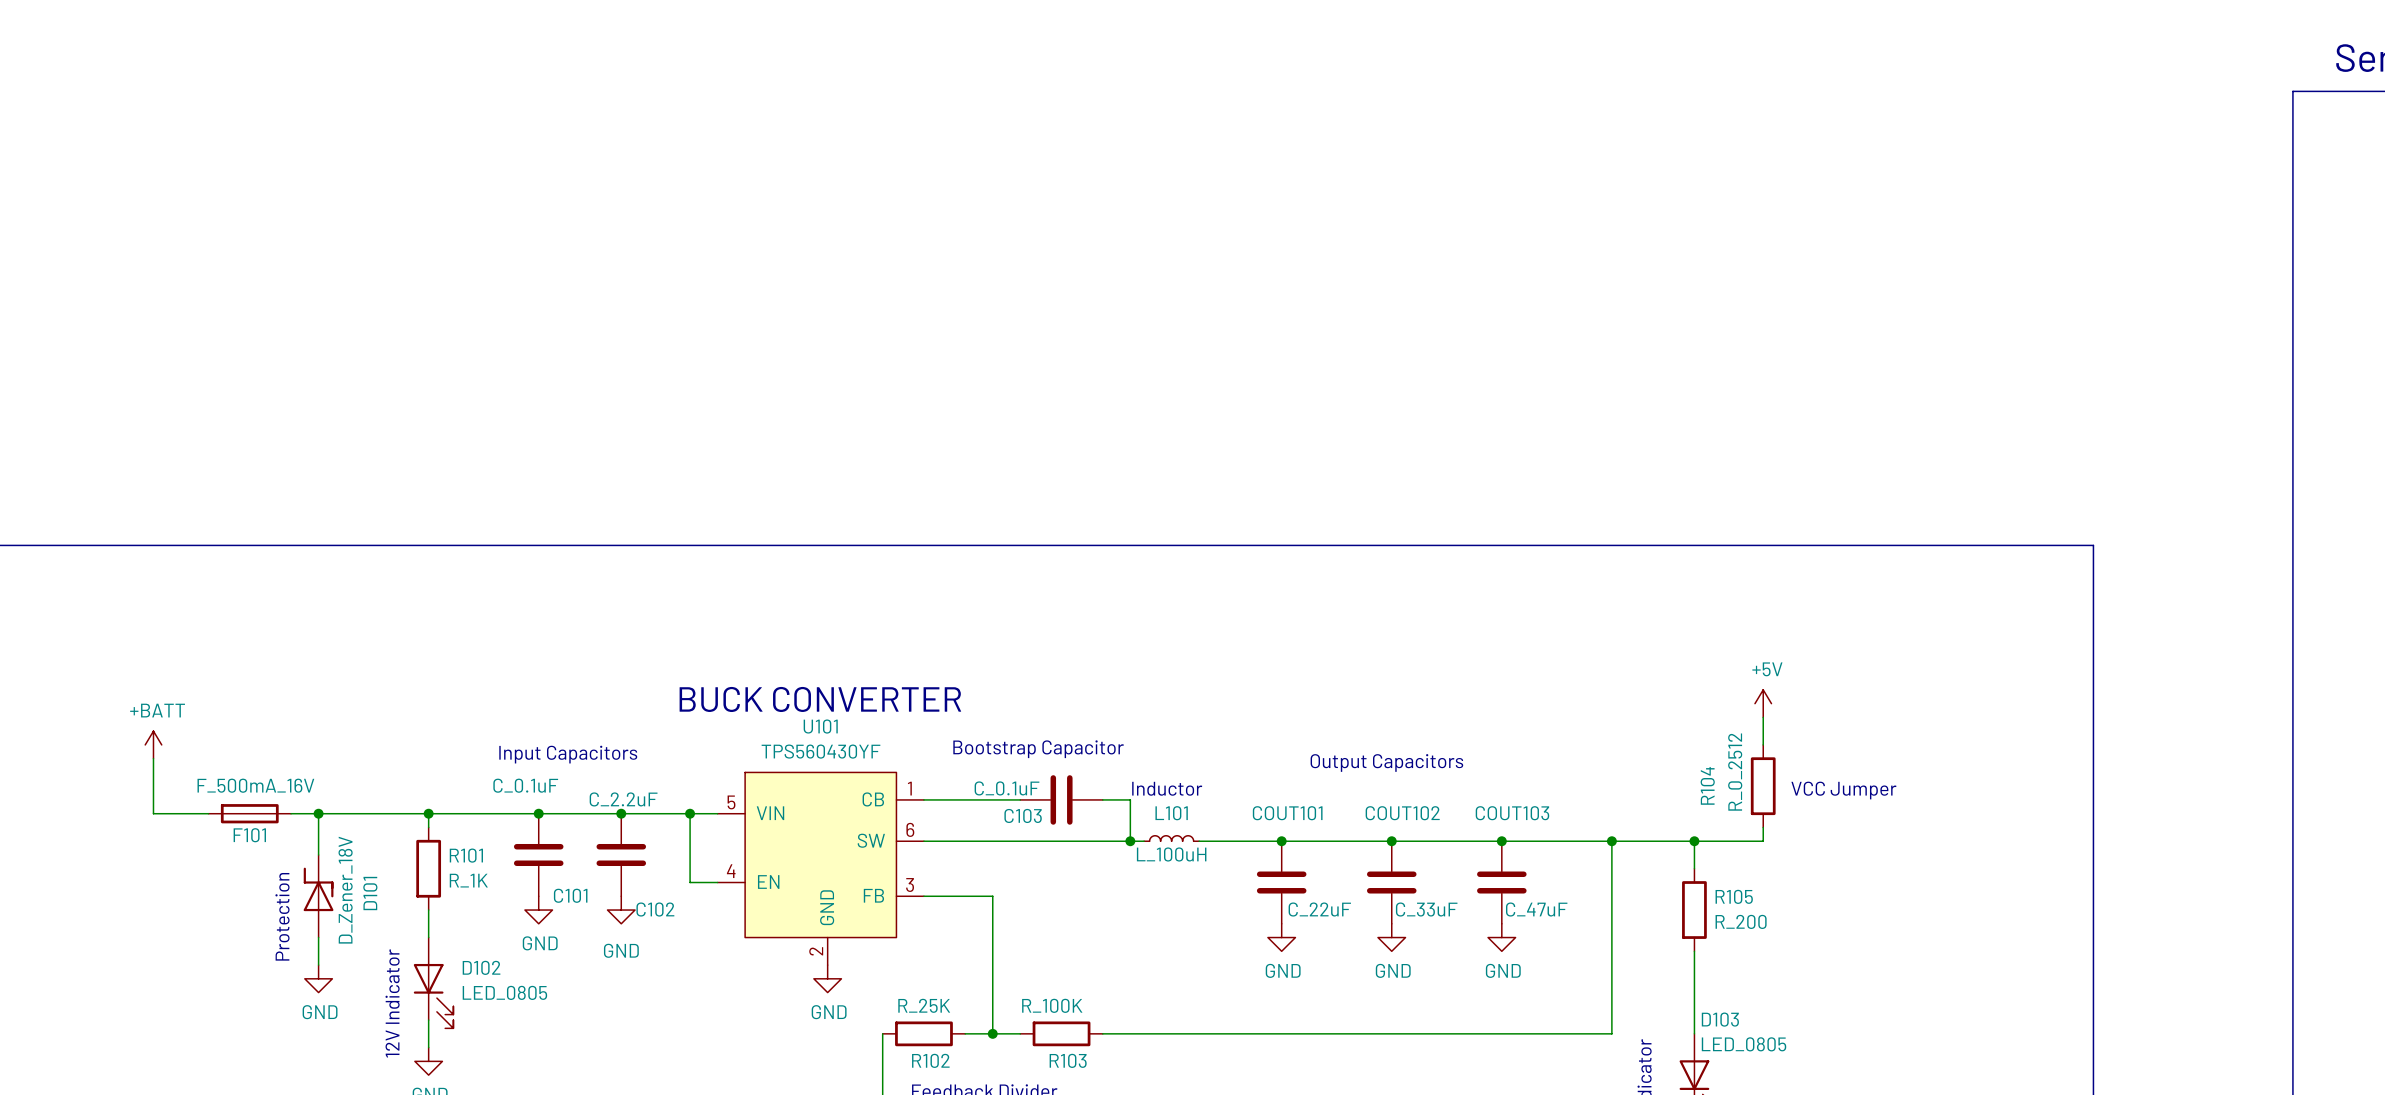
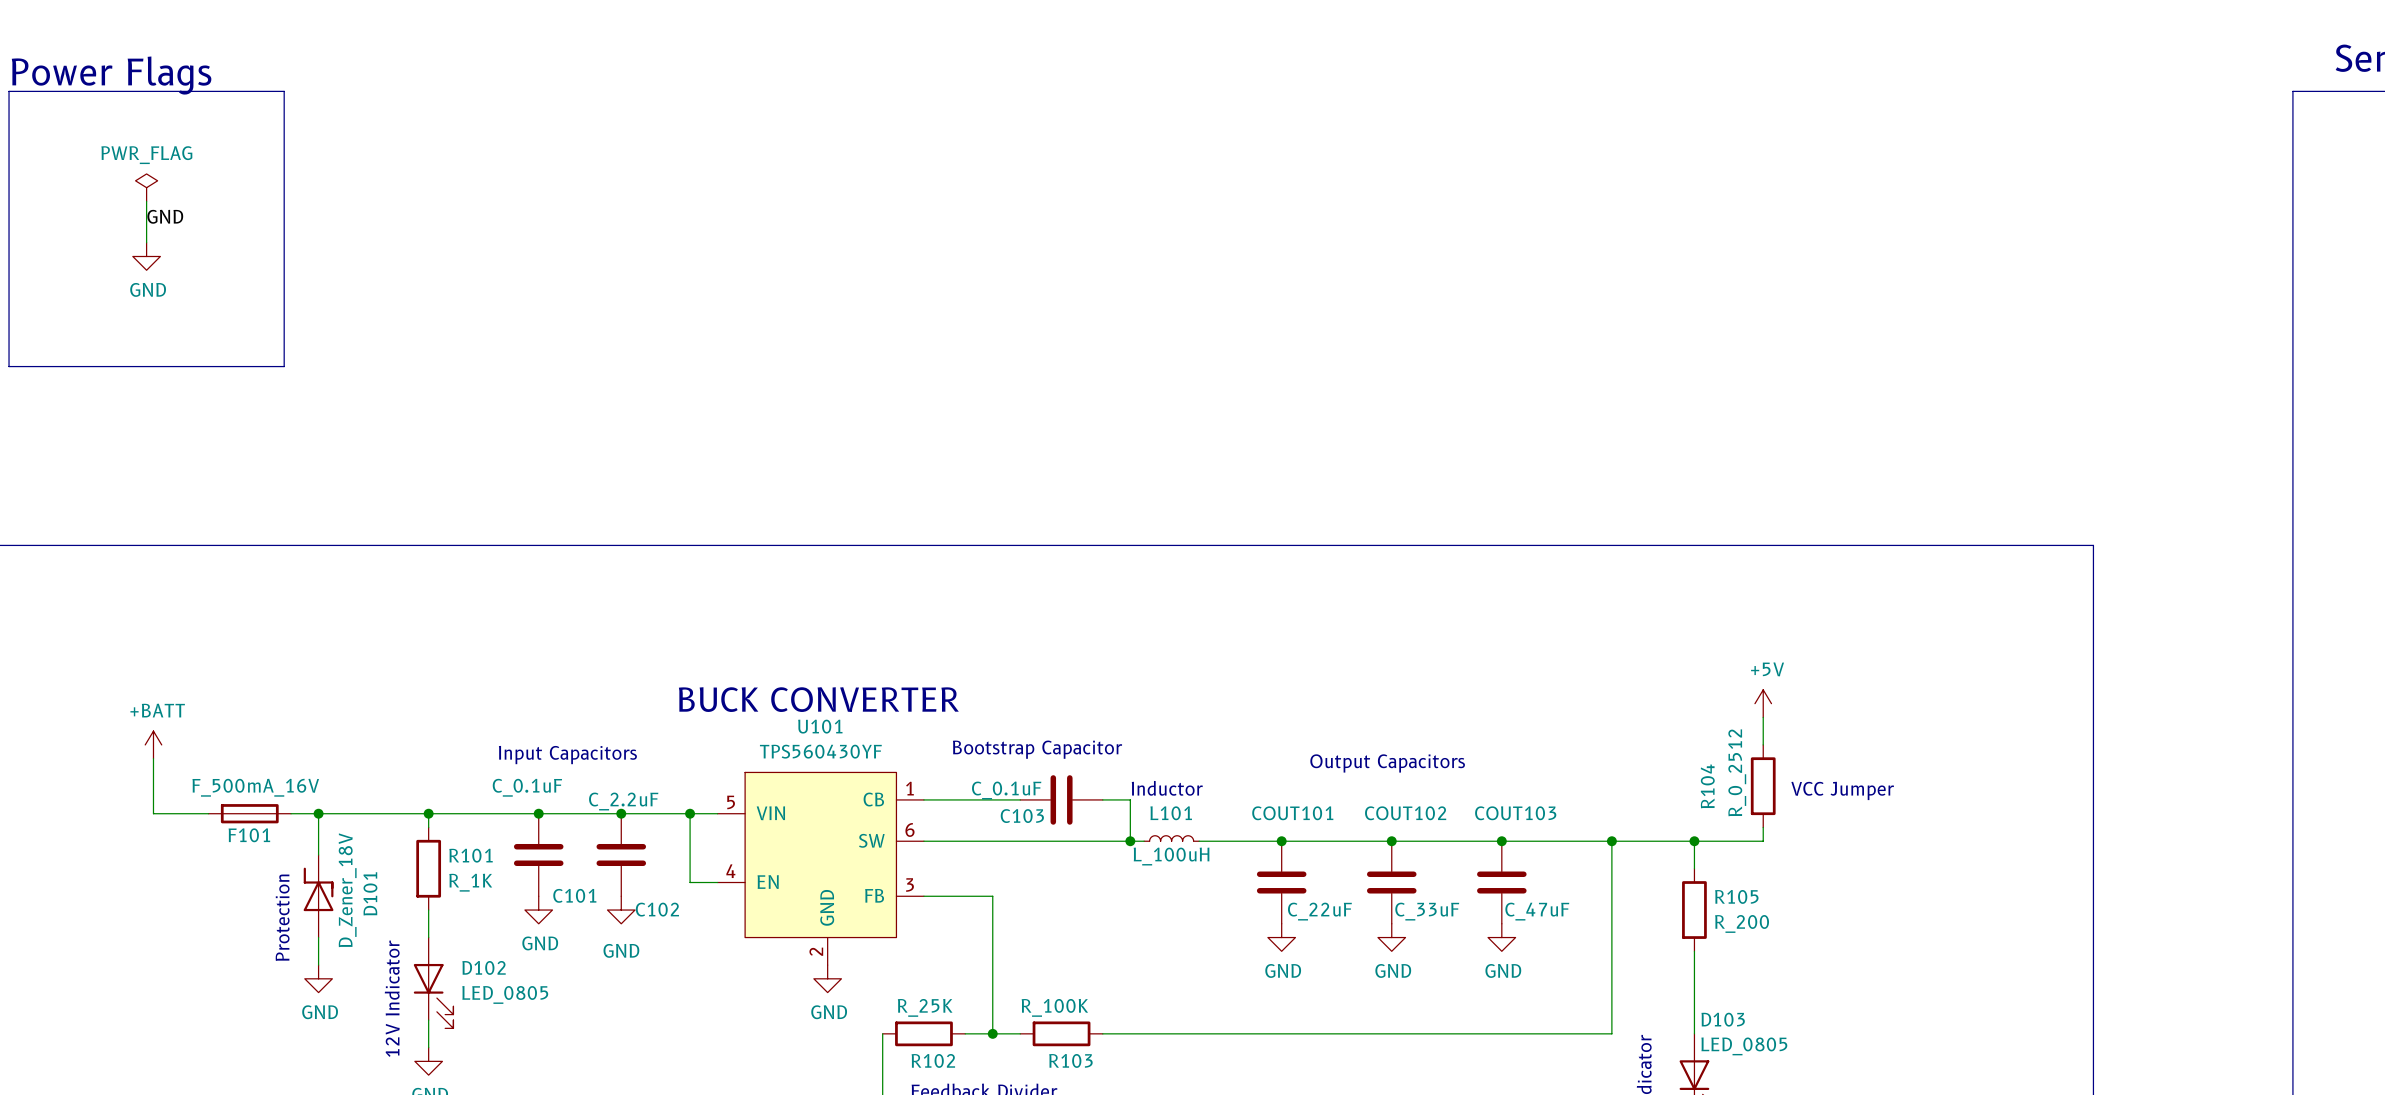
text: none -> Power Flags (111, 75)
line: none -> (9, 91) (284, 91) (284, 366) (9, 366) (9, 91)
power symbol: none -> PWR_FLAG (146, 187)
wire: none -> (146, 201) (146, 242)
label: none -> GND (165, 216)
power symbol: none -> GND (146, 256)

